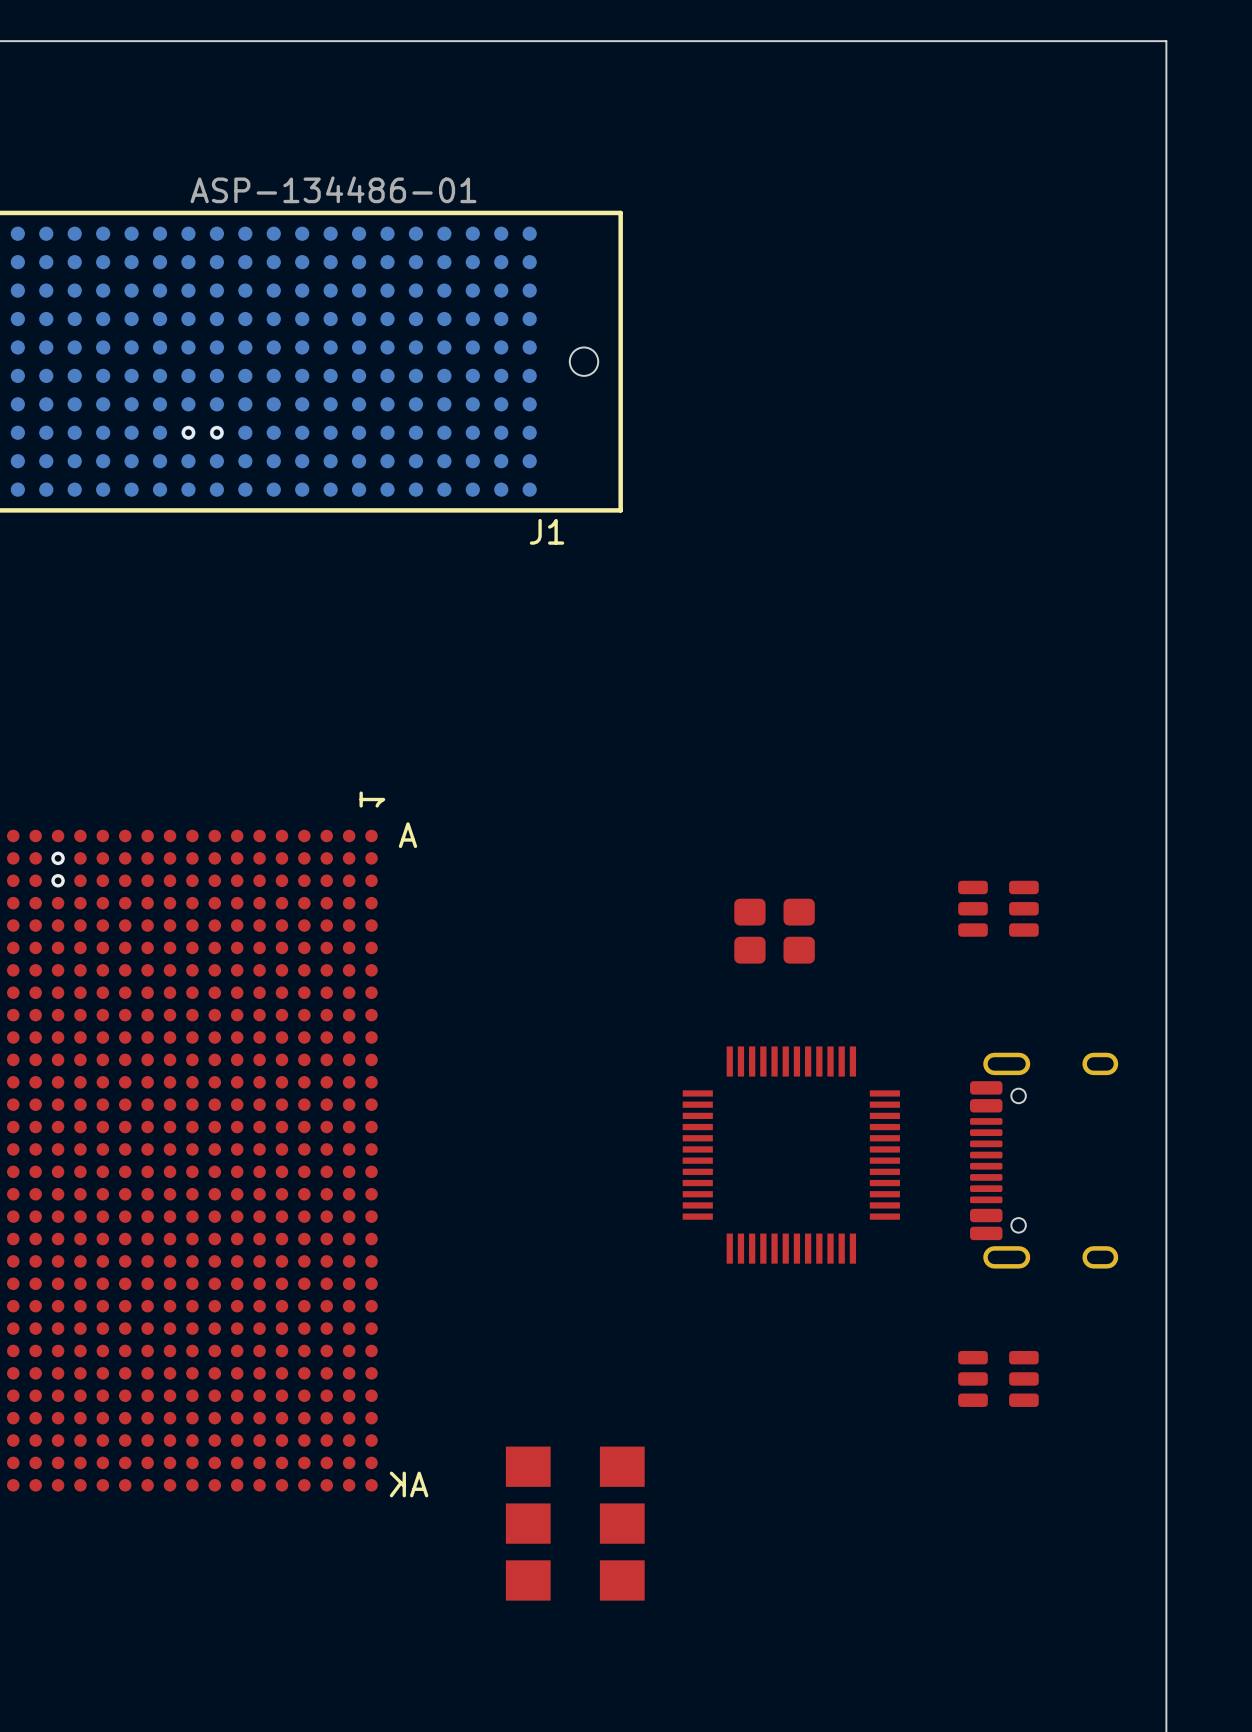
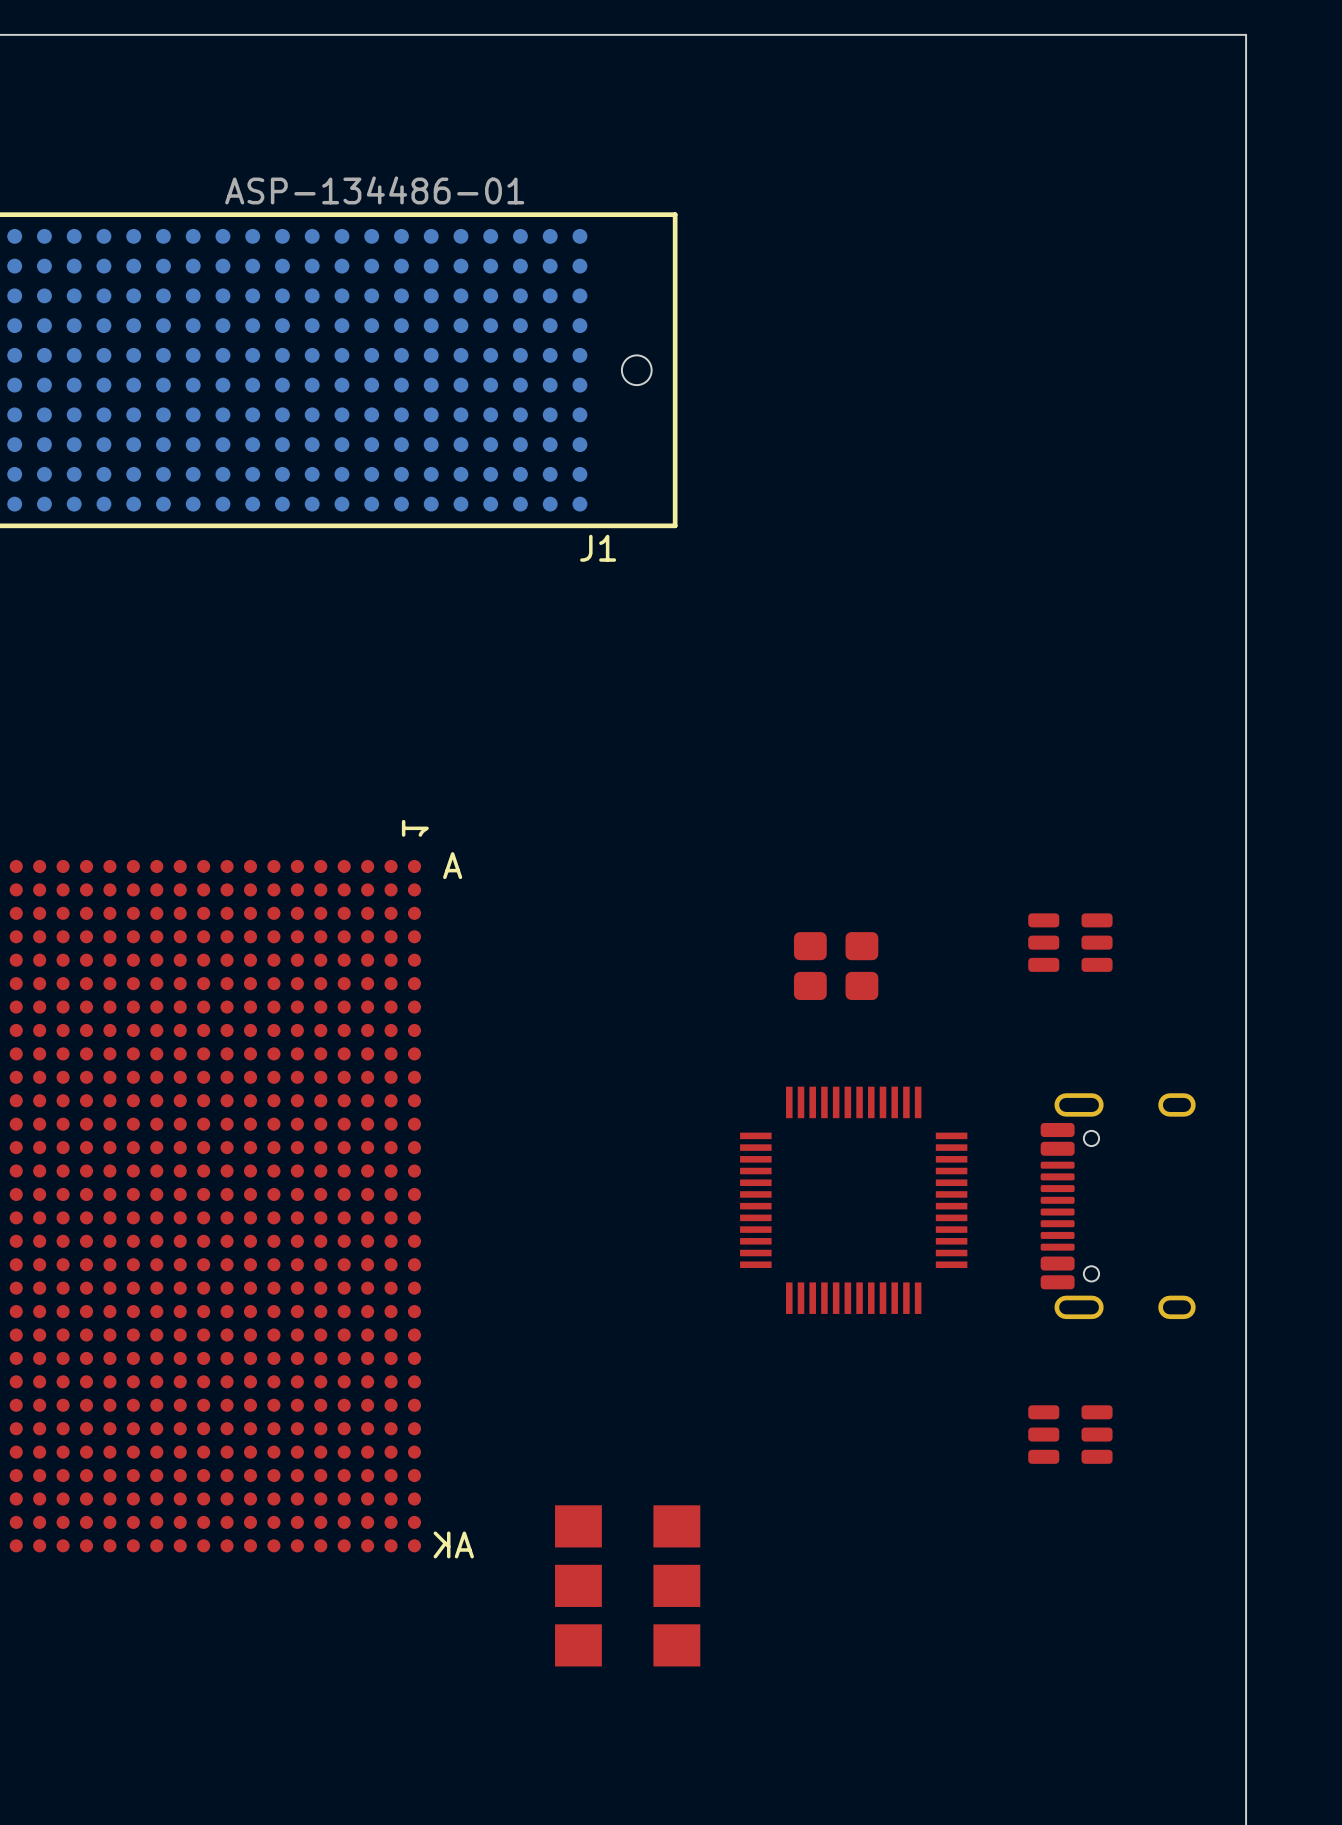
via: (188, 432) -> none
via: (216, 432) -> none
via: (58, 858) -> none
via: (58, 880) -> none

